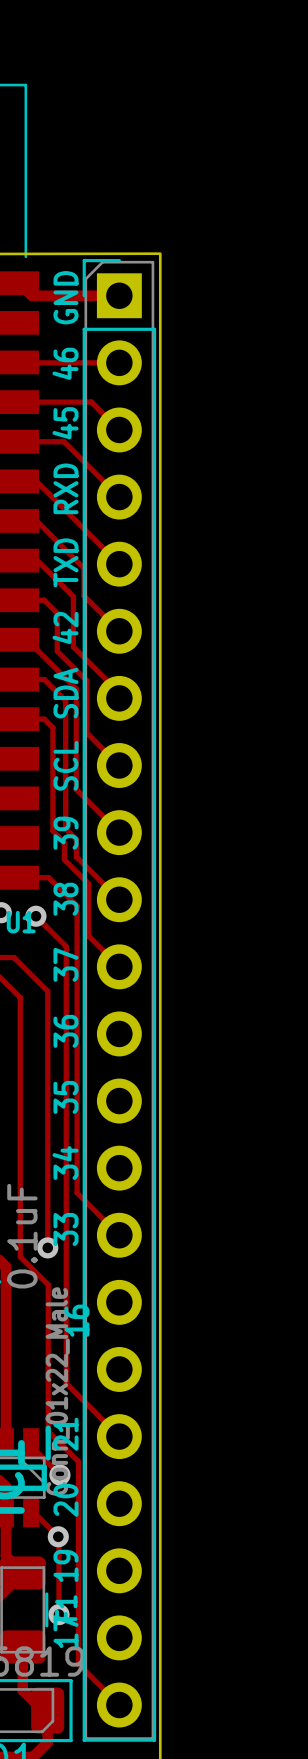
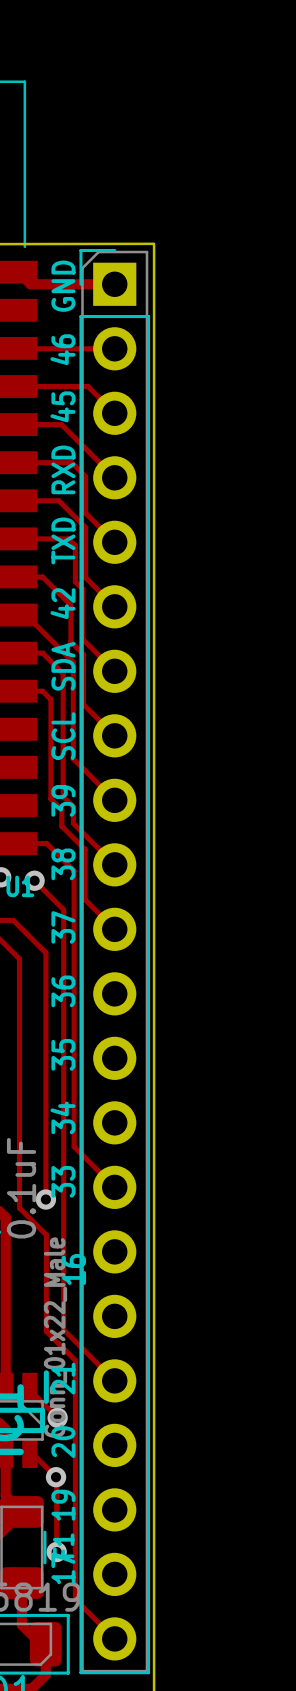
track: (36, 481) (88, 533) -> (35, 462) (71, 462) (85, 476) (85, 513)
track: (36, 520) (83, 568) (83, 595) (88, 600) -> (35, 500) (58, 500) (85, 527) (85, 577)
track: (37, 560) (73, 596) (73, 646) (119, 692) (119, 698) -> (35, 538) (68, 538) (75, 545) (75, 581) (82, 588) (82, 639) (114, 671)
track: (57, 613) (57, 651) (73, 667) -> (55, 589) (70, 605) (70, 641)
track: (48, 1385) (48, 1431) (78, 1461) -> (46, 1331) (75, 1360) (75, 1404)

